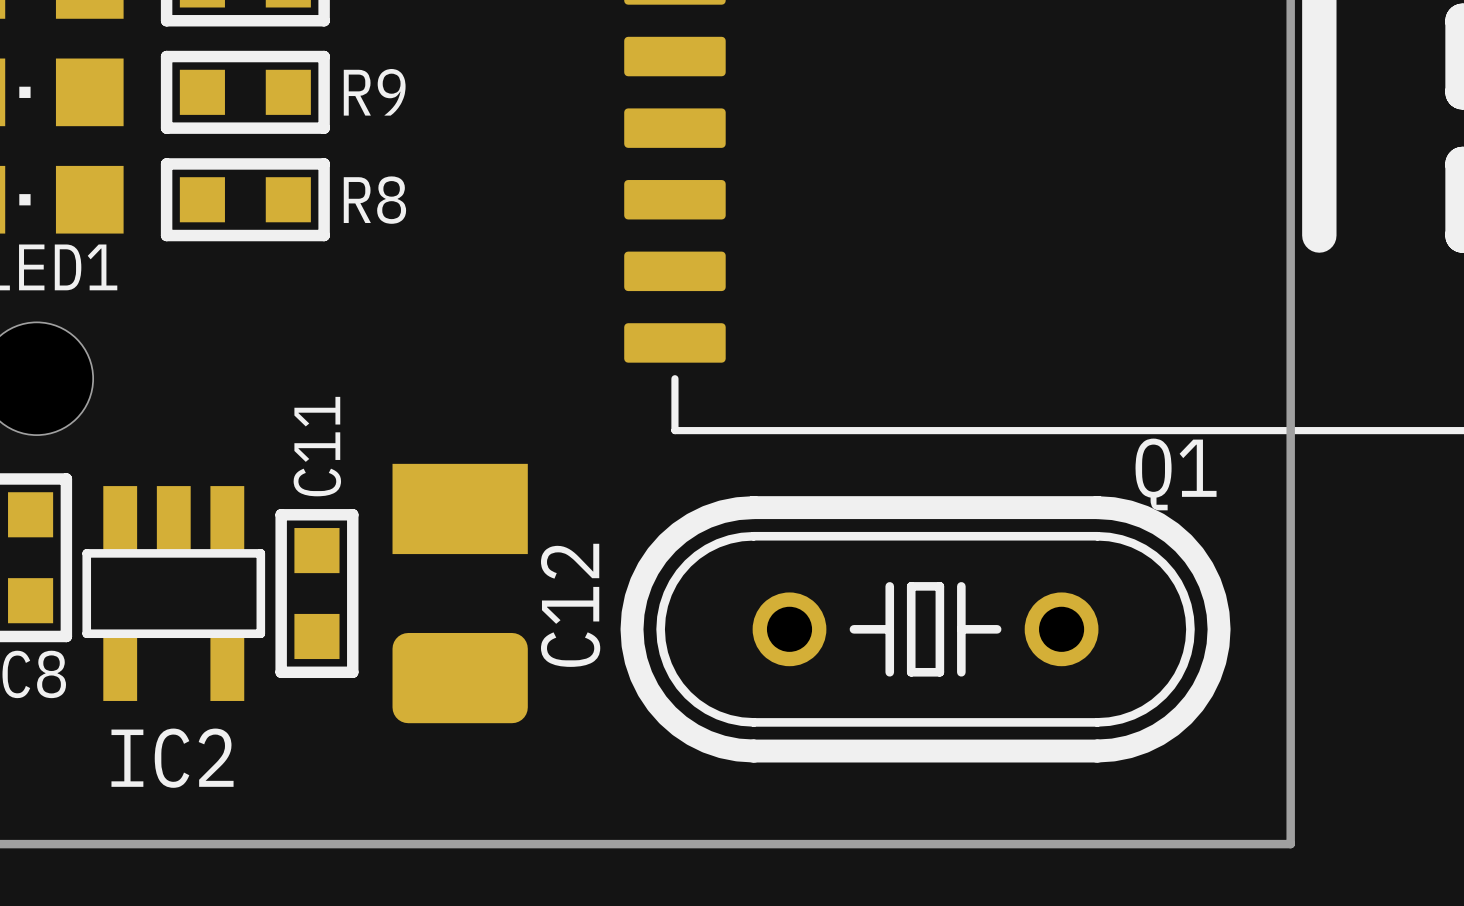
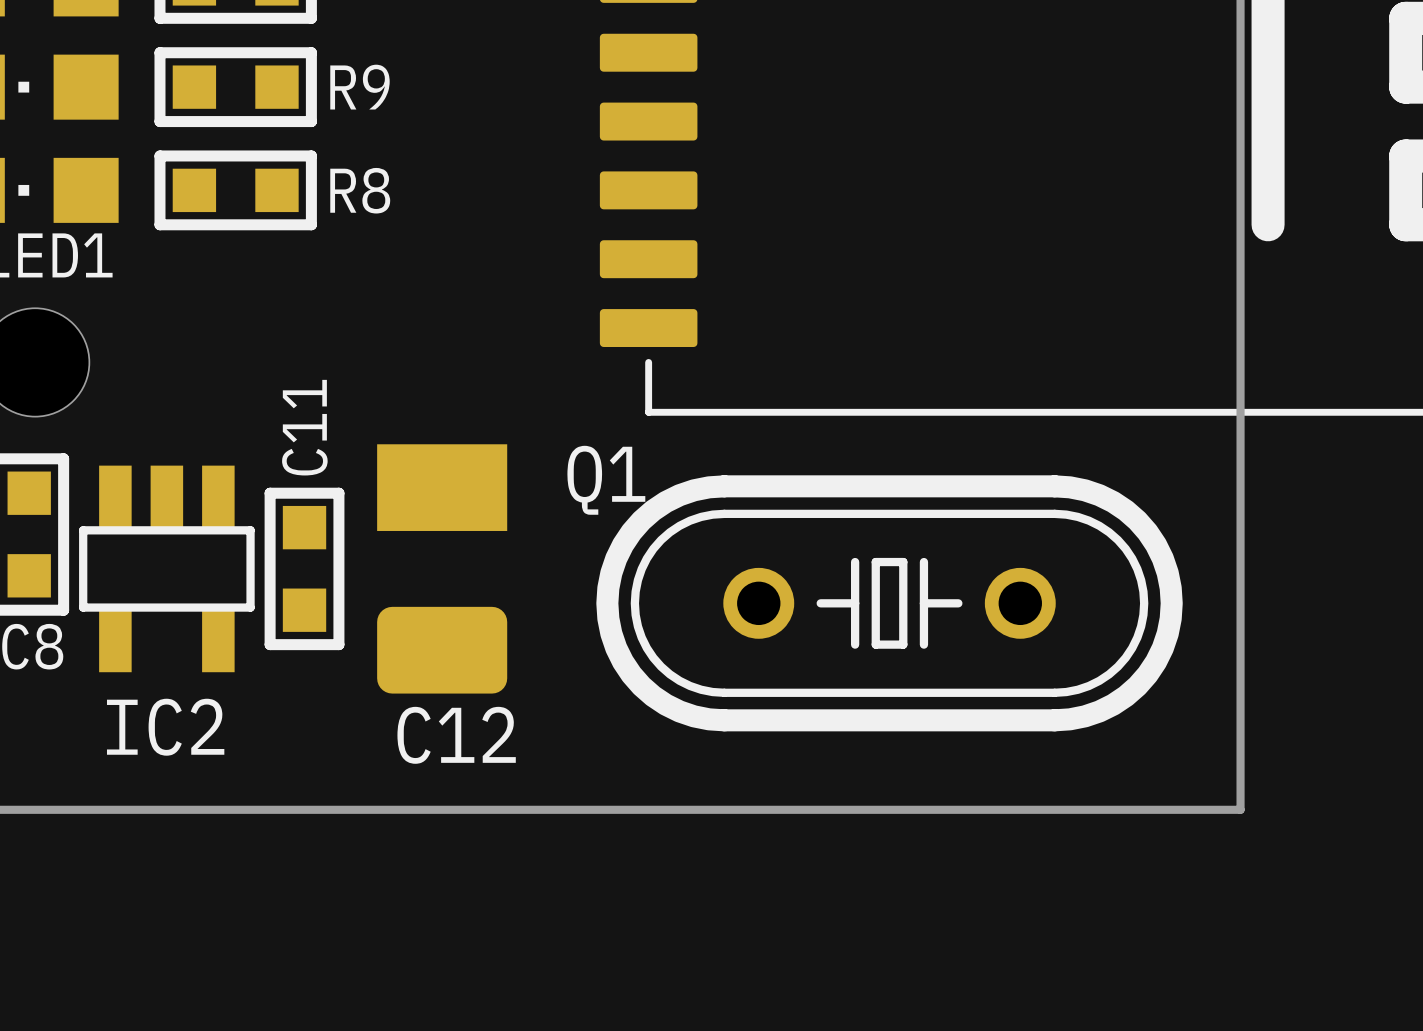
Q1 name position: Q1 (1176, 474) -> Q1 (606, 480)
C12 name rotation: 0° (570, 605) -> 90° clockwise (456, 735)
C12 name position: C12 (570, 605) -> C12 (456, 735)

